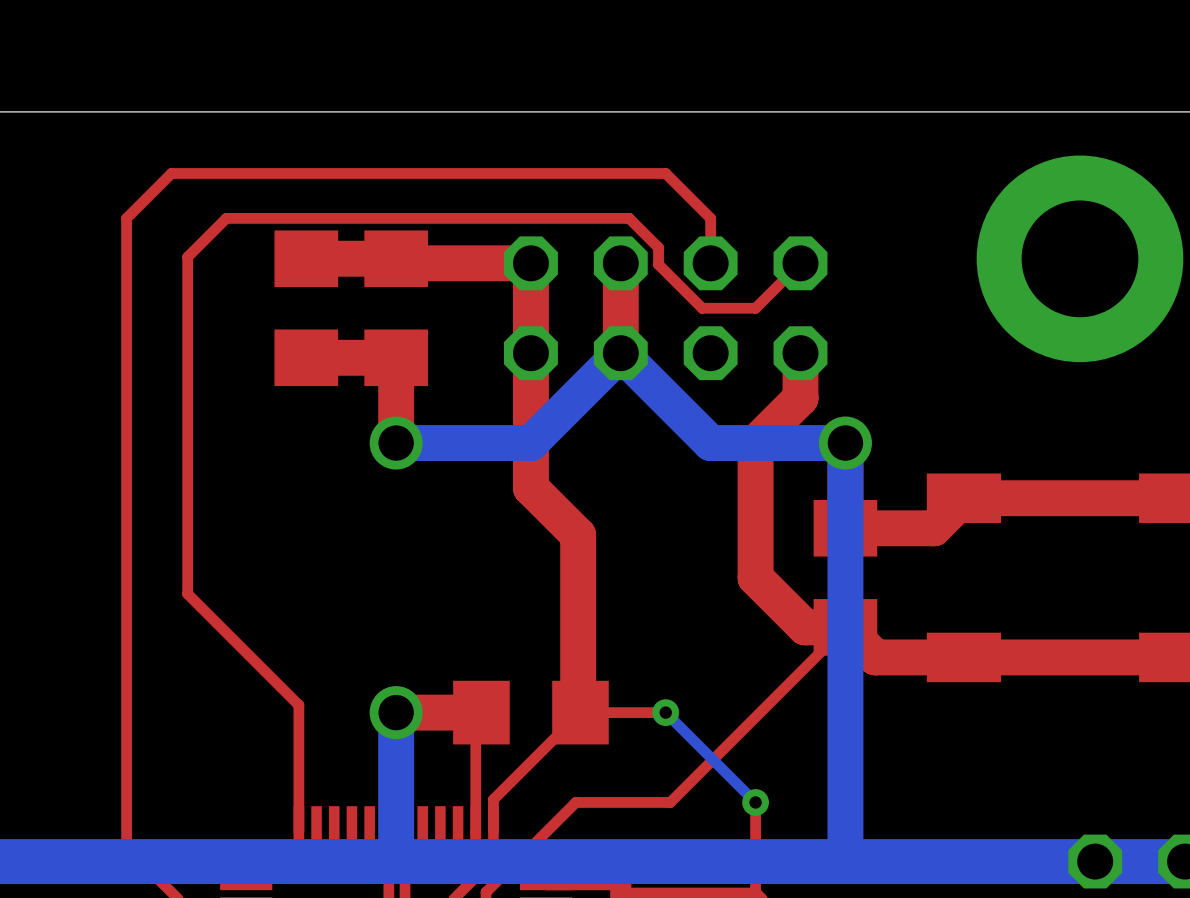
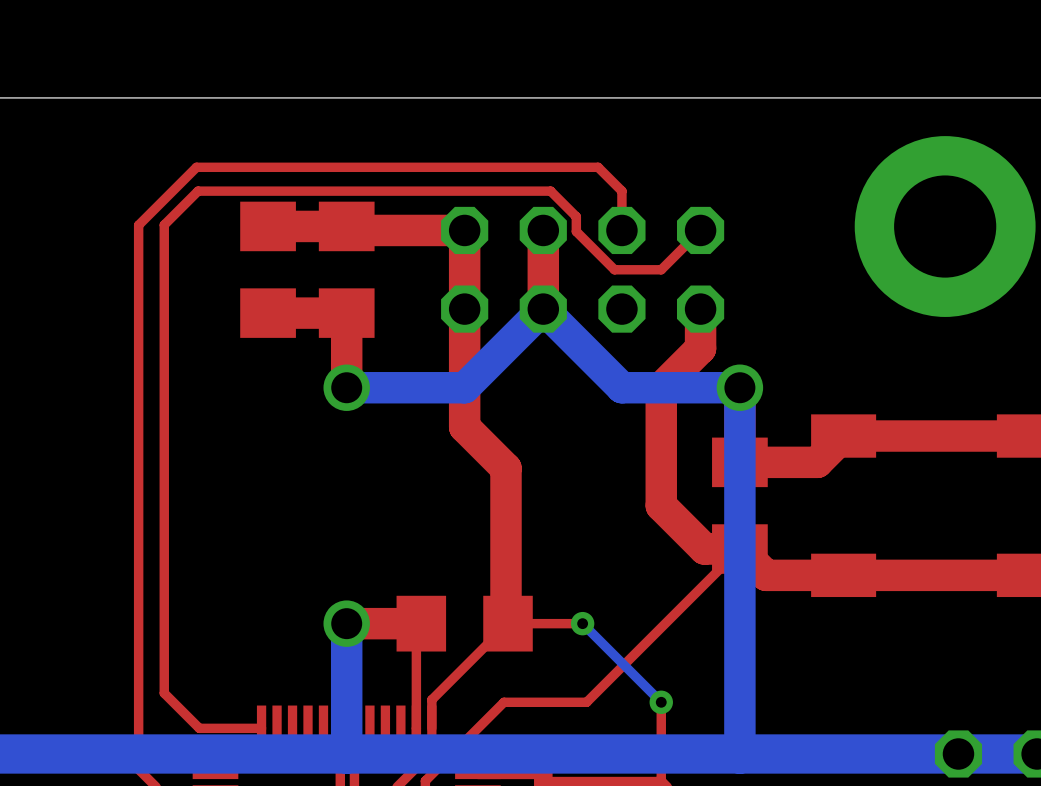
top track: (683, 191) (665, 173) (171, 173) (126, 218) (126, 847) (158, 879) -> (598, 167) (196, 167) (138, 225) (138, 769)
top track: (187, 594) (298, 705) (298, 832) -> (164, 519) (164, 693) (199, 728) (261, 728)

